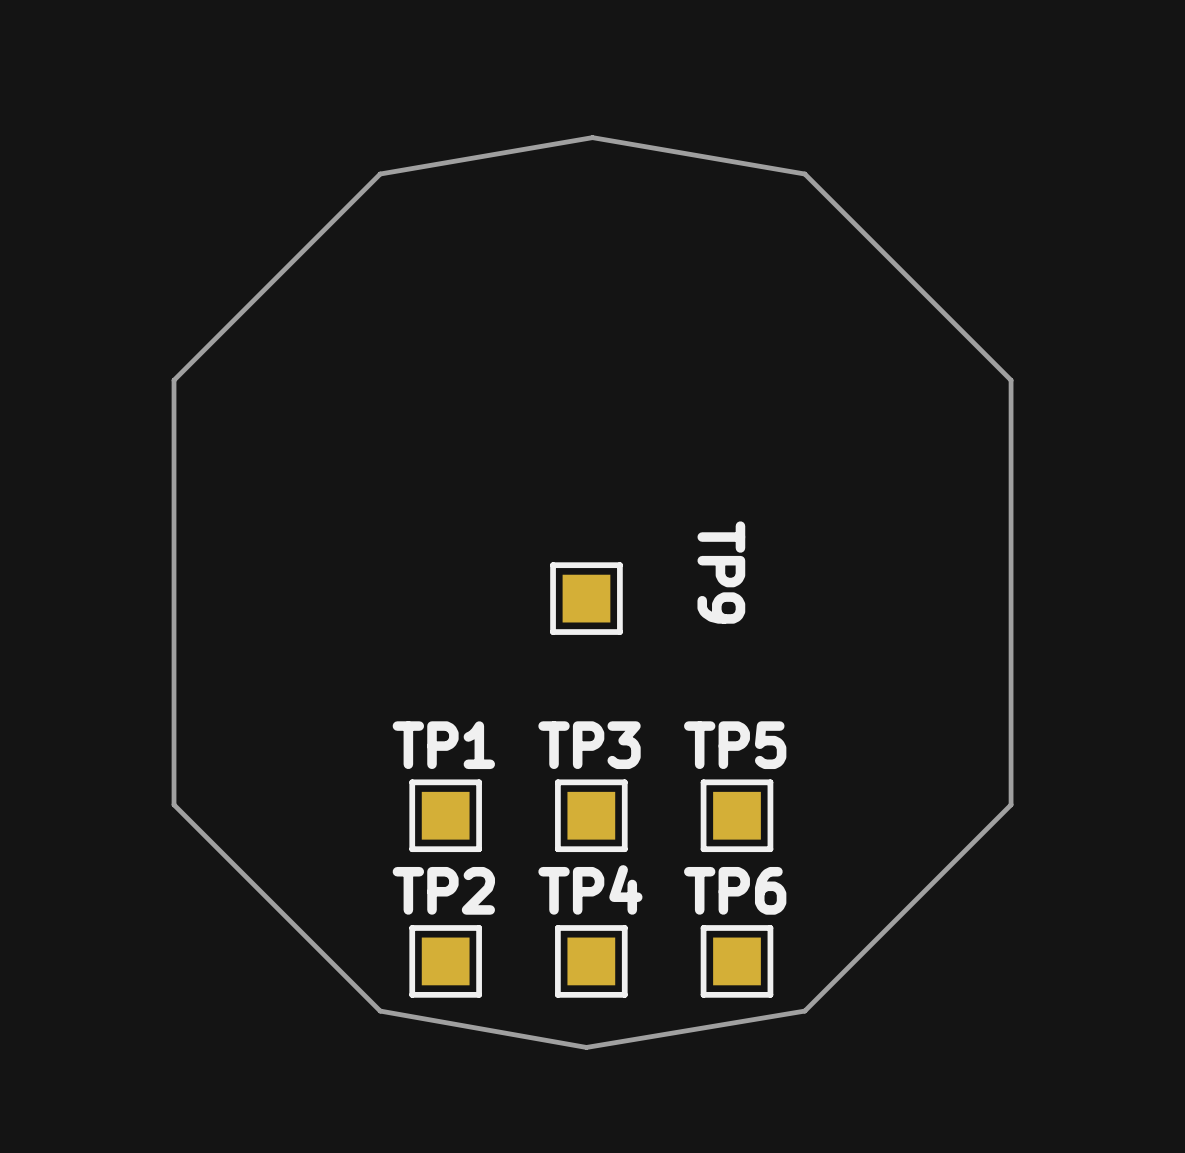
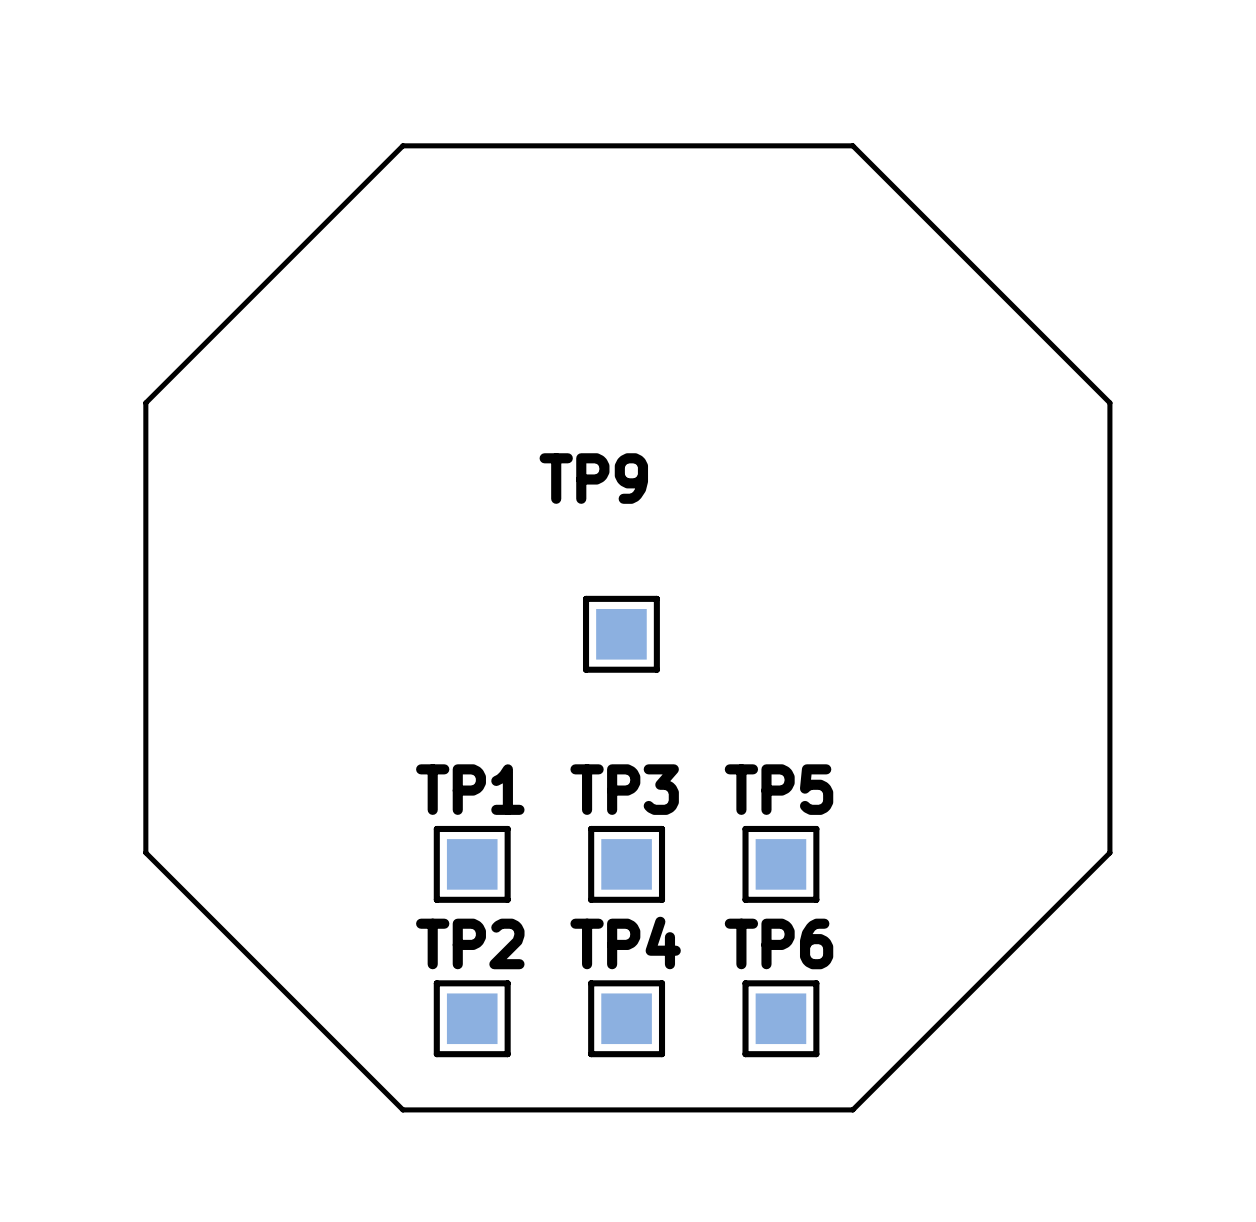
board edge: (592, 137) (804, 174) (1011, 380) (1011, 804) (804, 1011) (586, 1047) (380, 1011) (174, 804) (174, 380) (380, 174) (592, 137) -> (852, 145) (1109, 402) (1109, 852) (852, 1109) (402, 1109) (145, 852) (145, 402) (402, 145) (852, 145)
TP9 name rotation: 0° (721, 572) -> 90° counterclockwise (593, 478)
TP9 name position: TP9 (721, 572) -> TP9 (593, 478)

